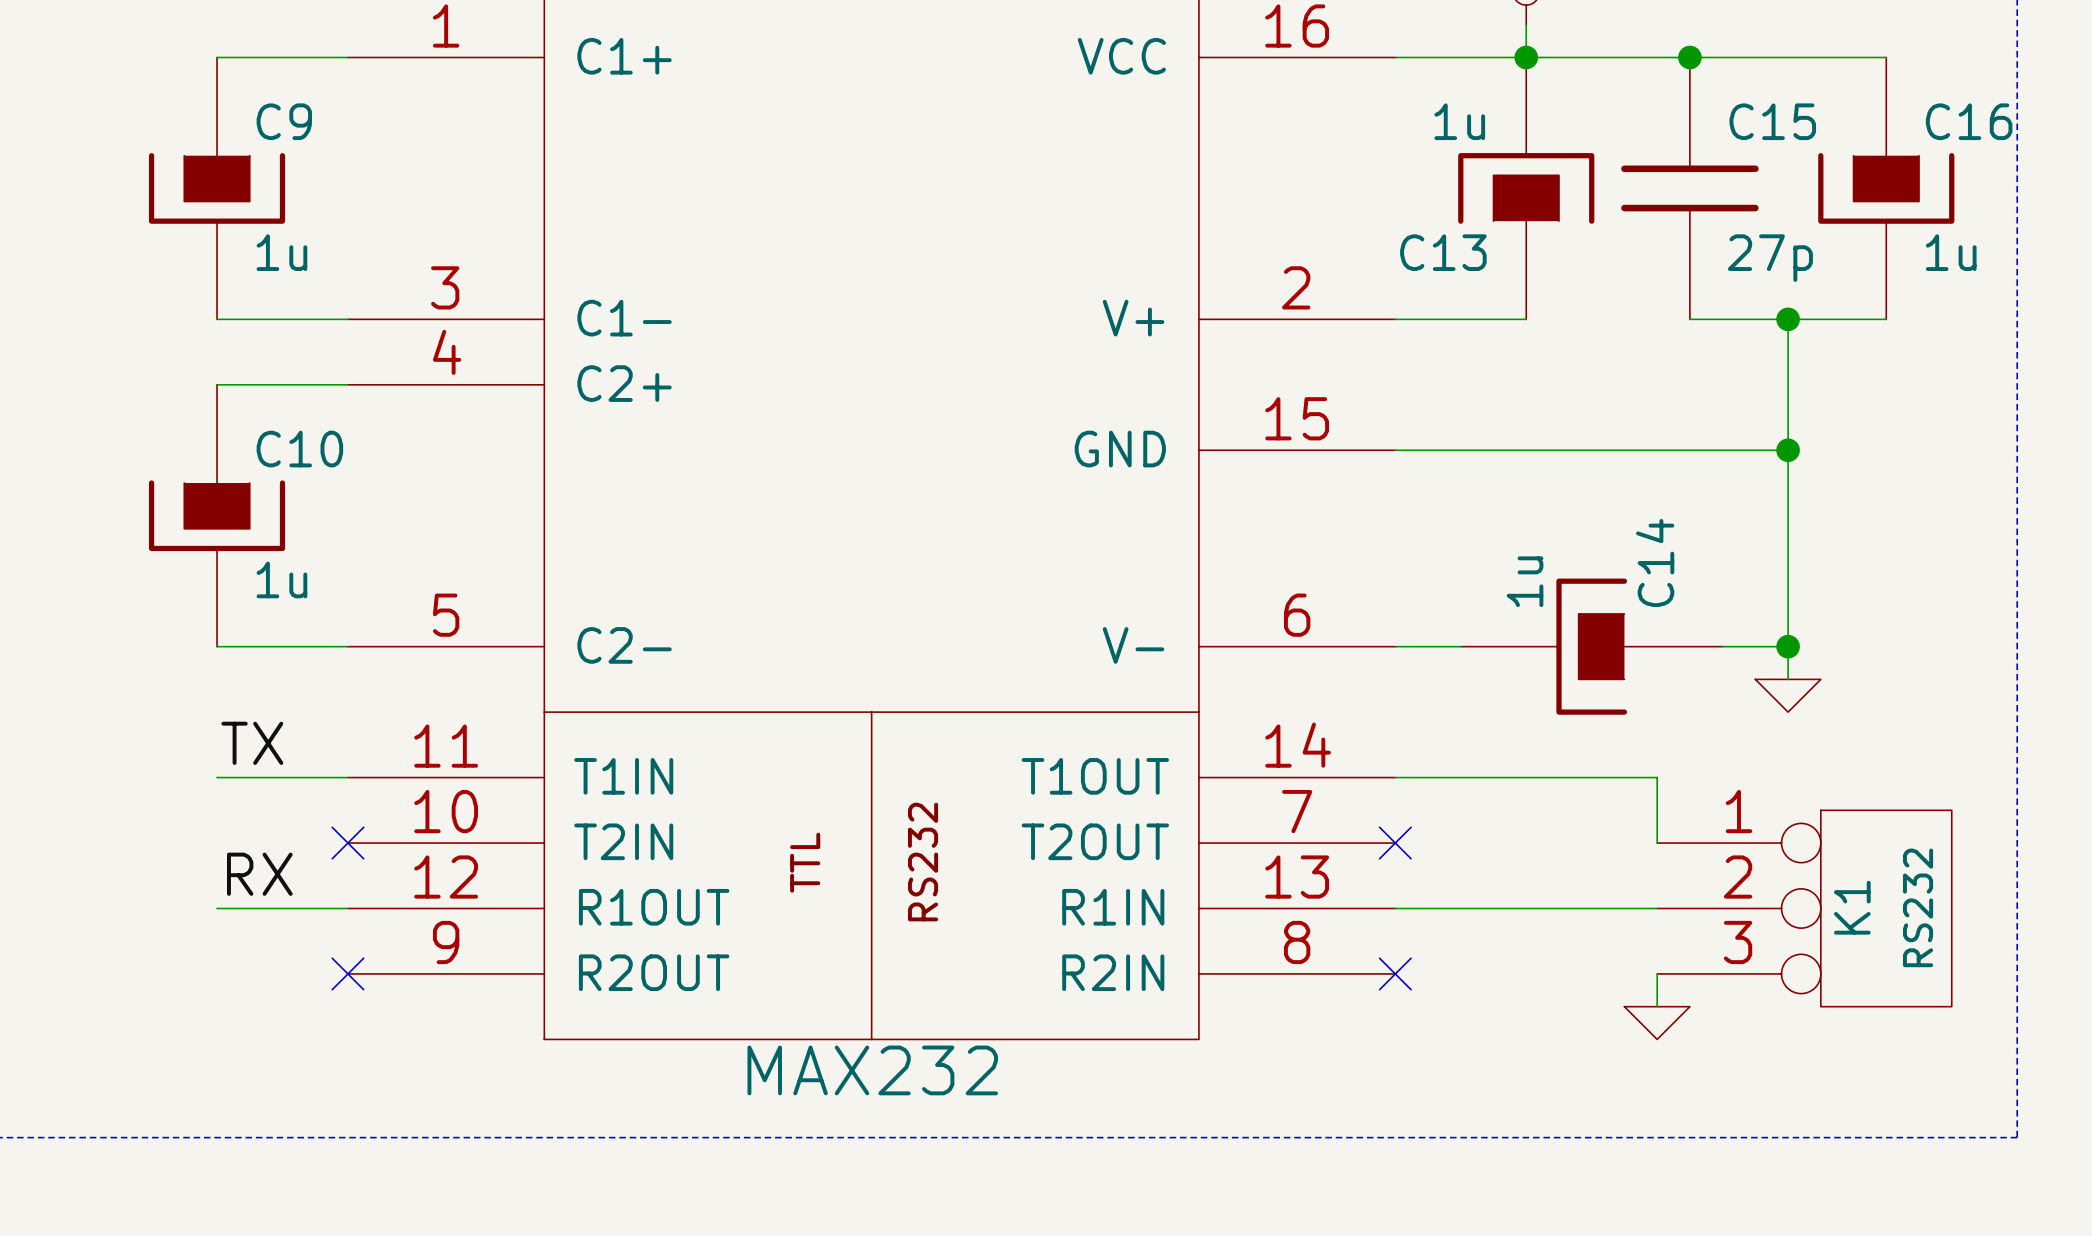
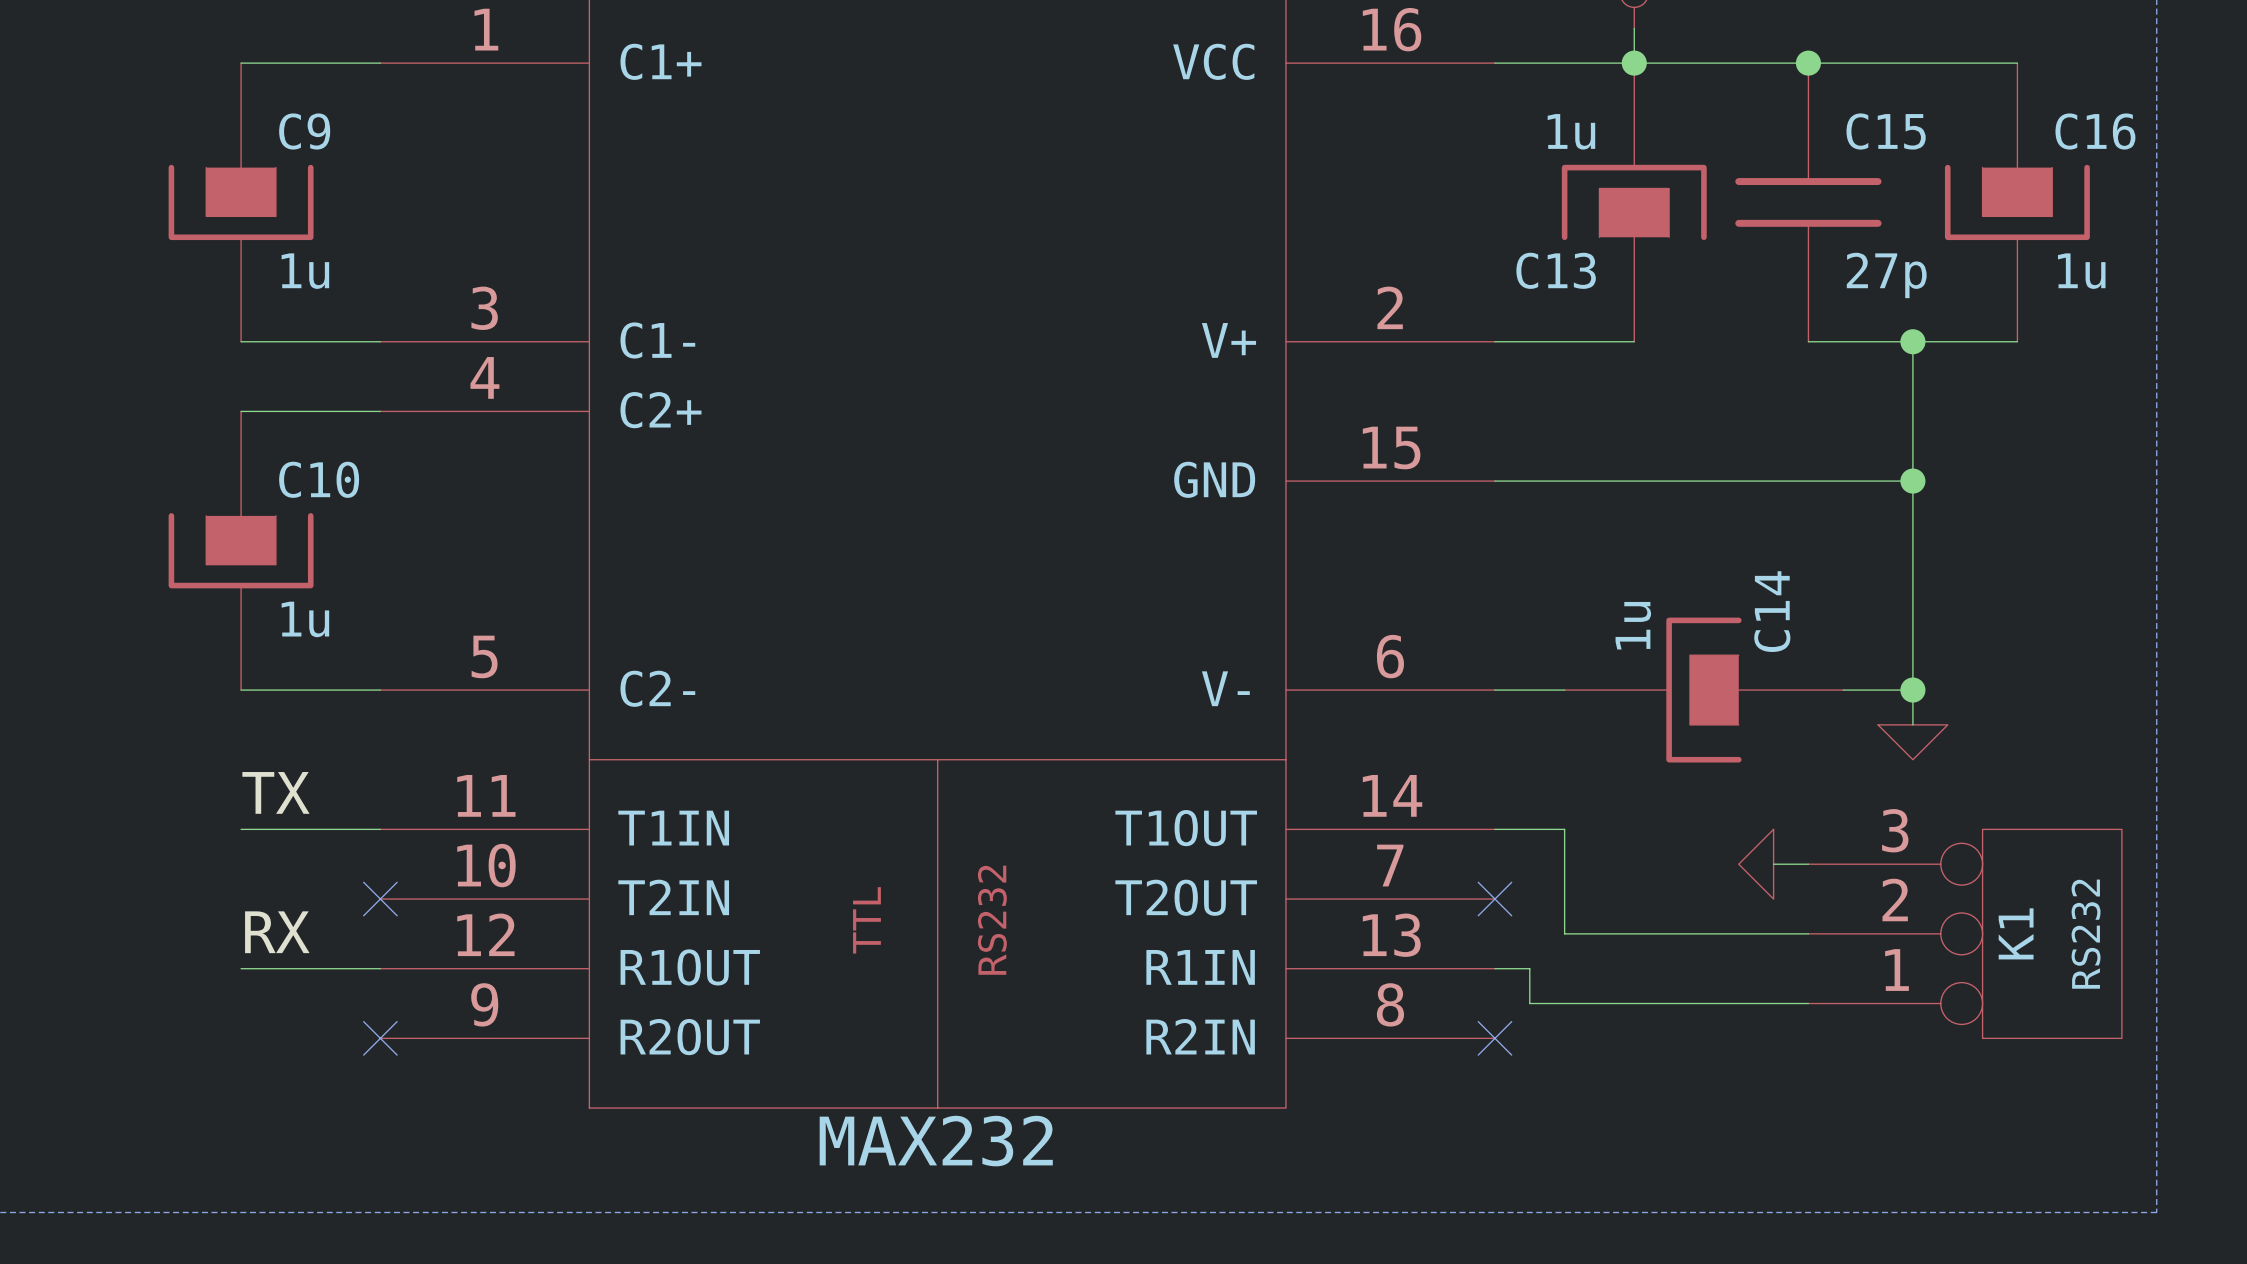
wire: (1460, 777) (1657, 777) (1657, 843) -> (1564, 829) (1564, 933) (1808, 933)
wire: none -> (1773, 864) (1808, 864)
wire: (1428, 908) (1657, 908) -> (1529, 968) (1529, 1003) (1808, 1003)
K1 flip: as is (1886, 908) -> up-down (2052, 933)
wire: (1657, 973) (1657, 1006) -> none
power symbol rotation: 0° (1657, 1023) -> 90° clockwise (1756, 864)
power symbol position: (1657, 1023) -> (1756, 864)

